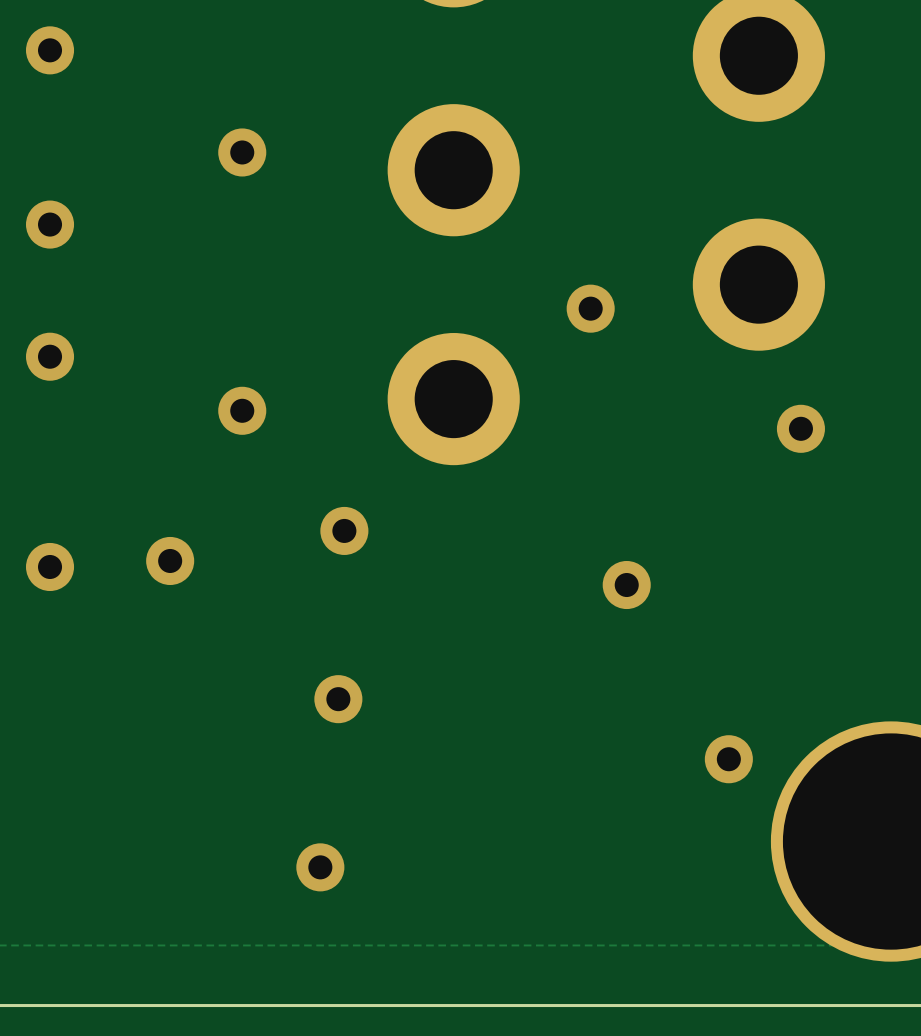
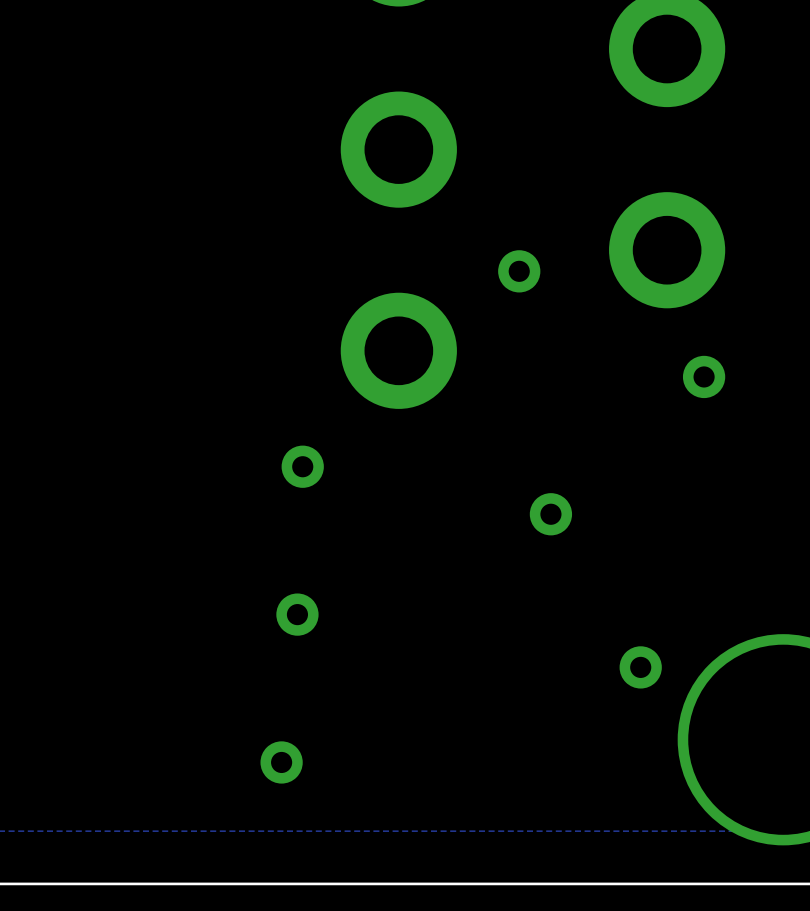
via: (50, 50) -> none
via: (242, 152) -> none
via: (50, 224) -> none
via: (50, 356) -> none
via: (242, 410) -> none
via: (170, 560) -> none
via: (50, 566) -> none

